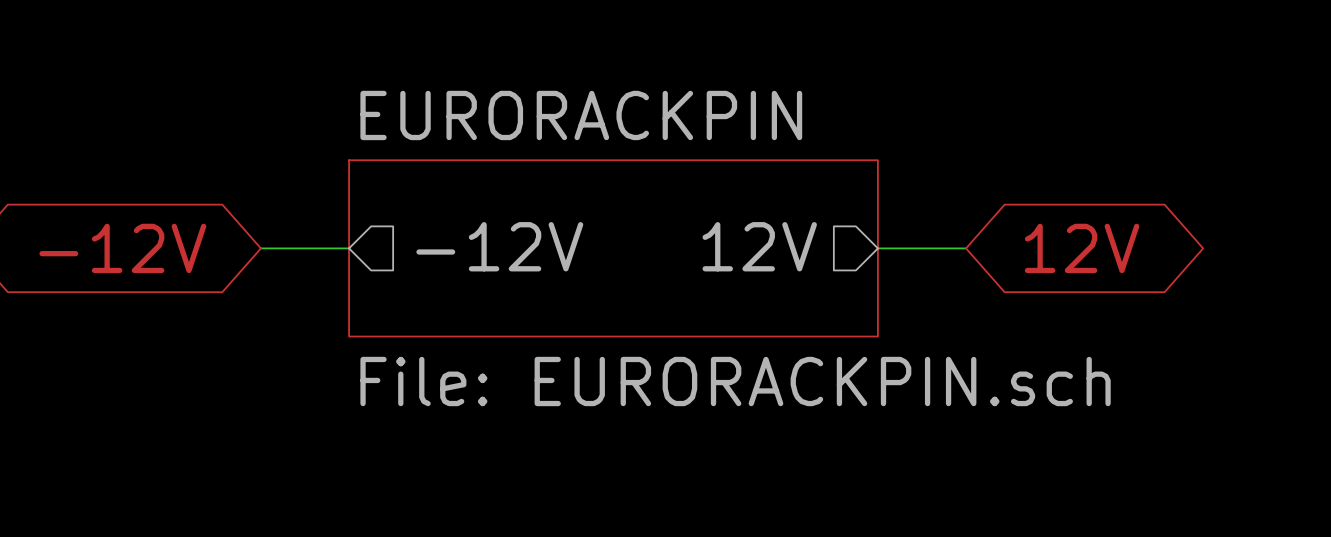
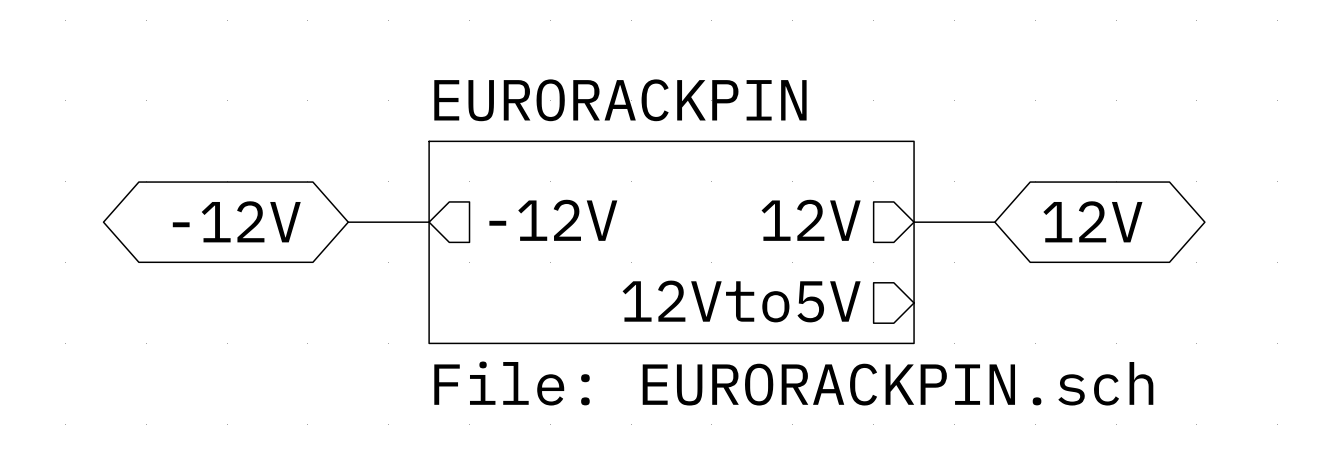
sheet EURORACKPIN shape: [349, 160, 878, 337] -> [429, 141, 915, 344]
sheet pin: none -> 12Vto5V (741, 301)

